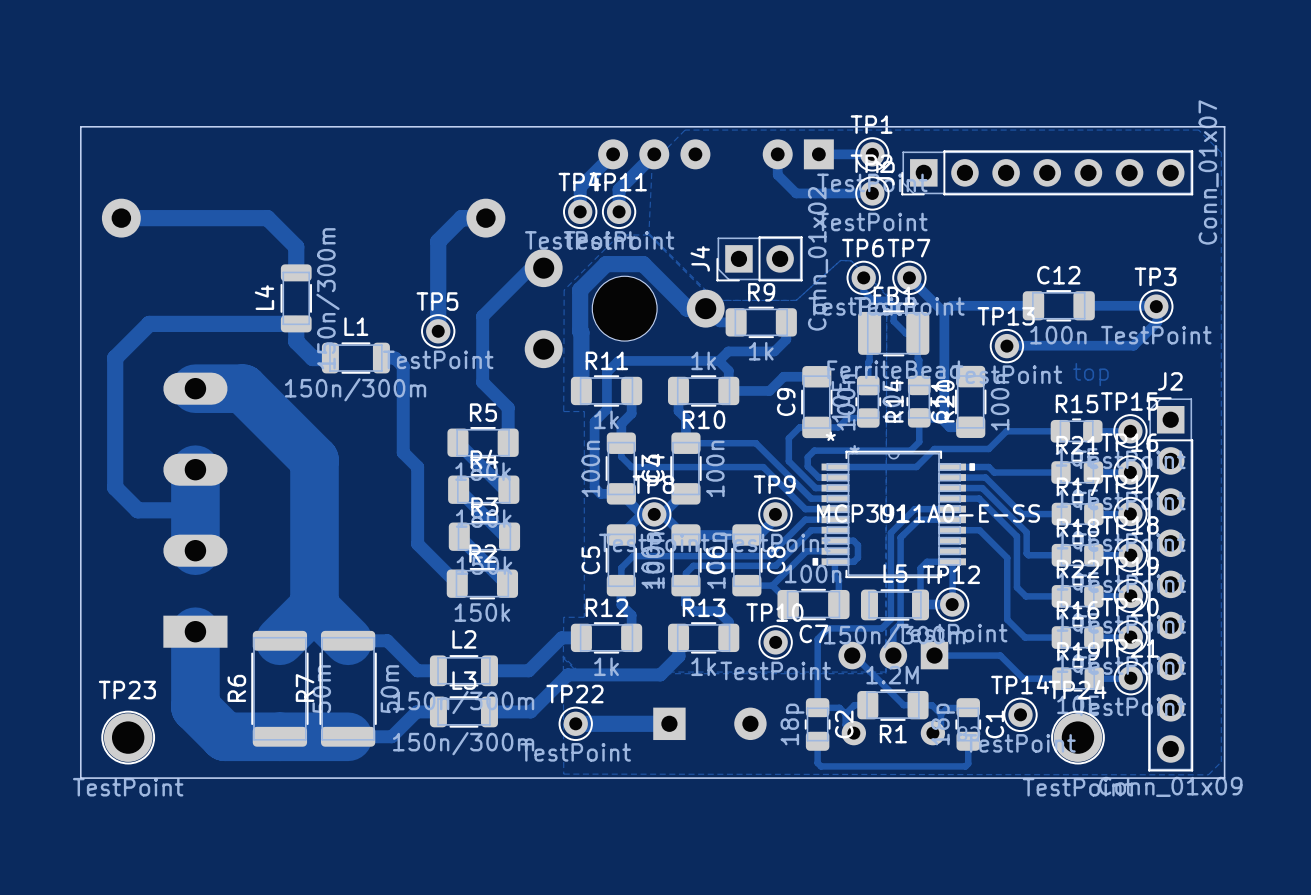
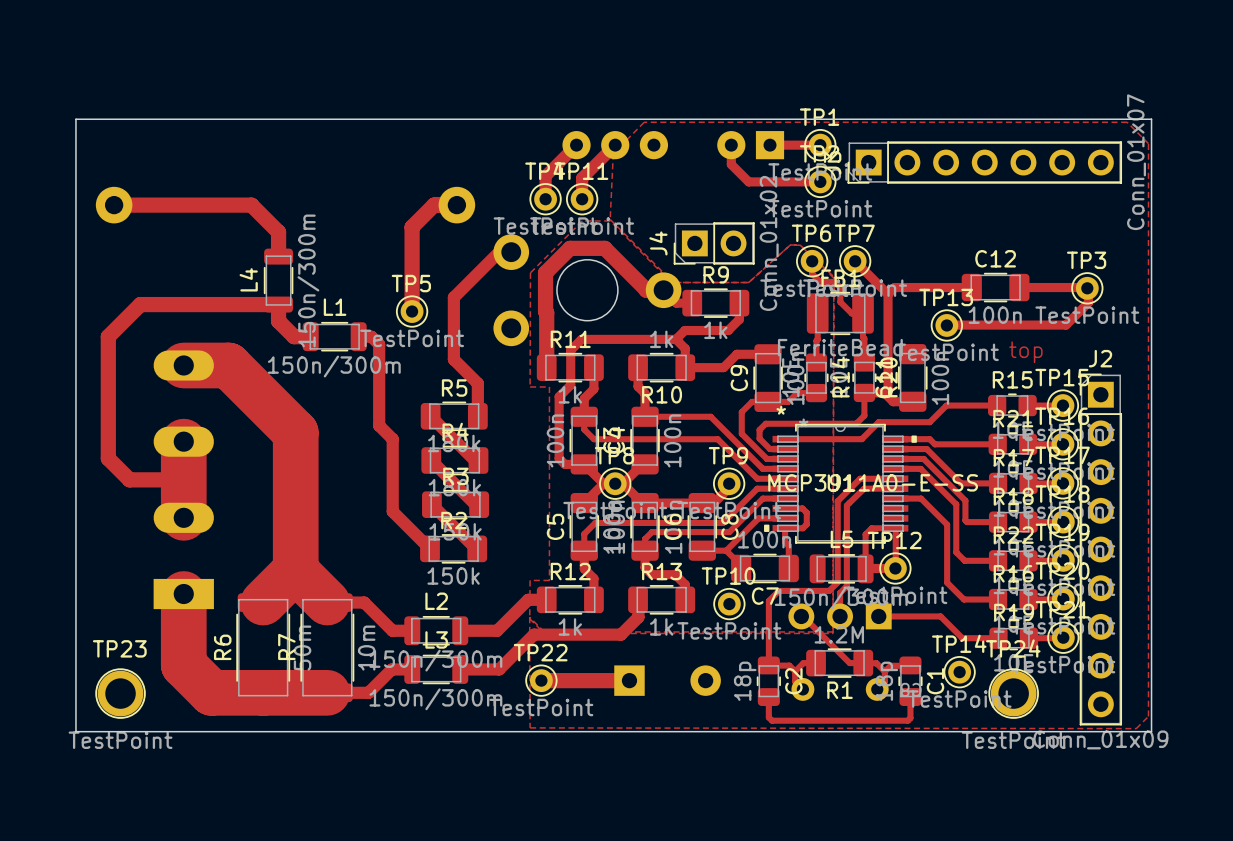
R7 value: 50m (389, 689) -> 10m (366, 648)

